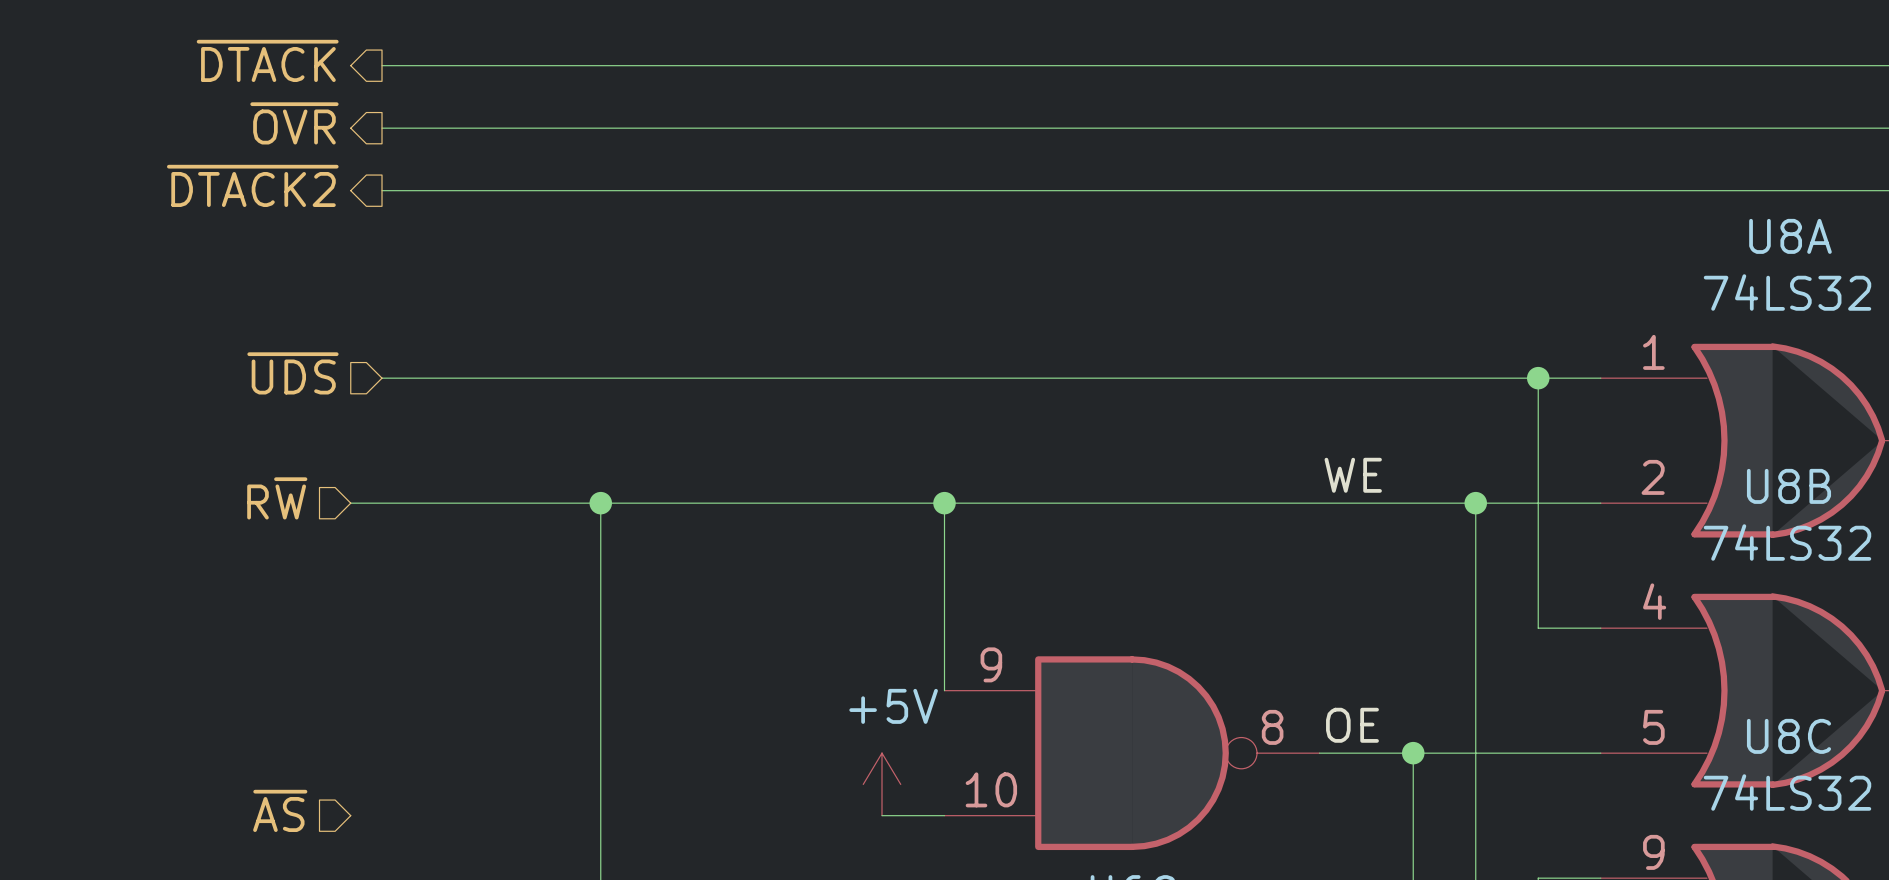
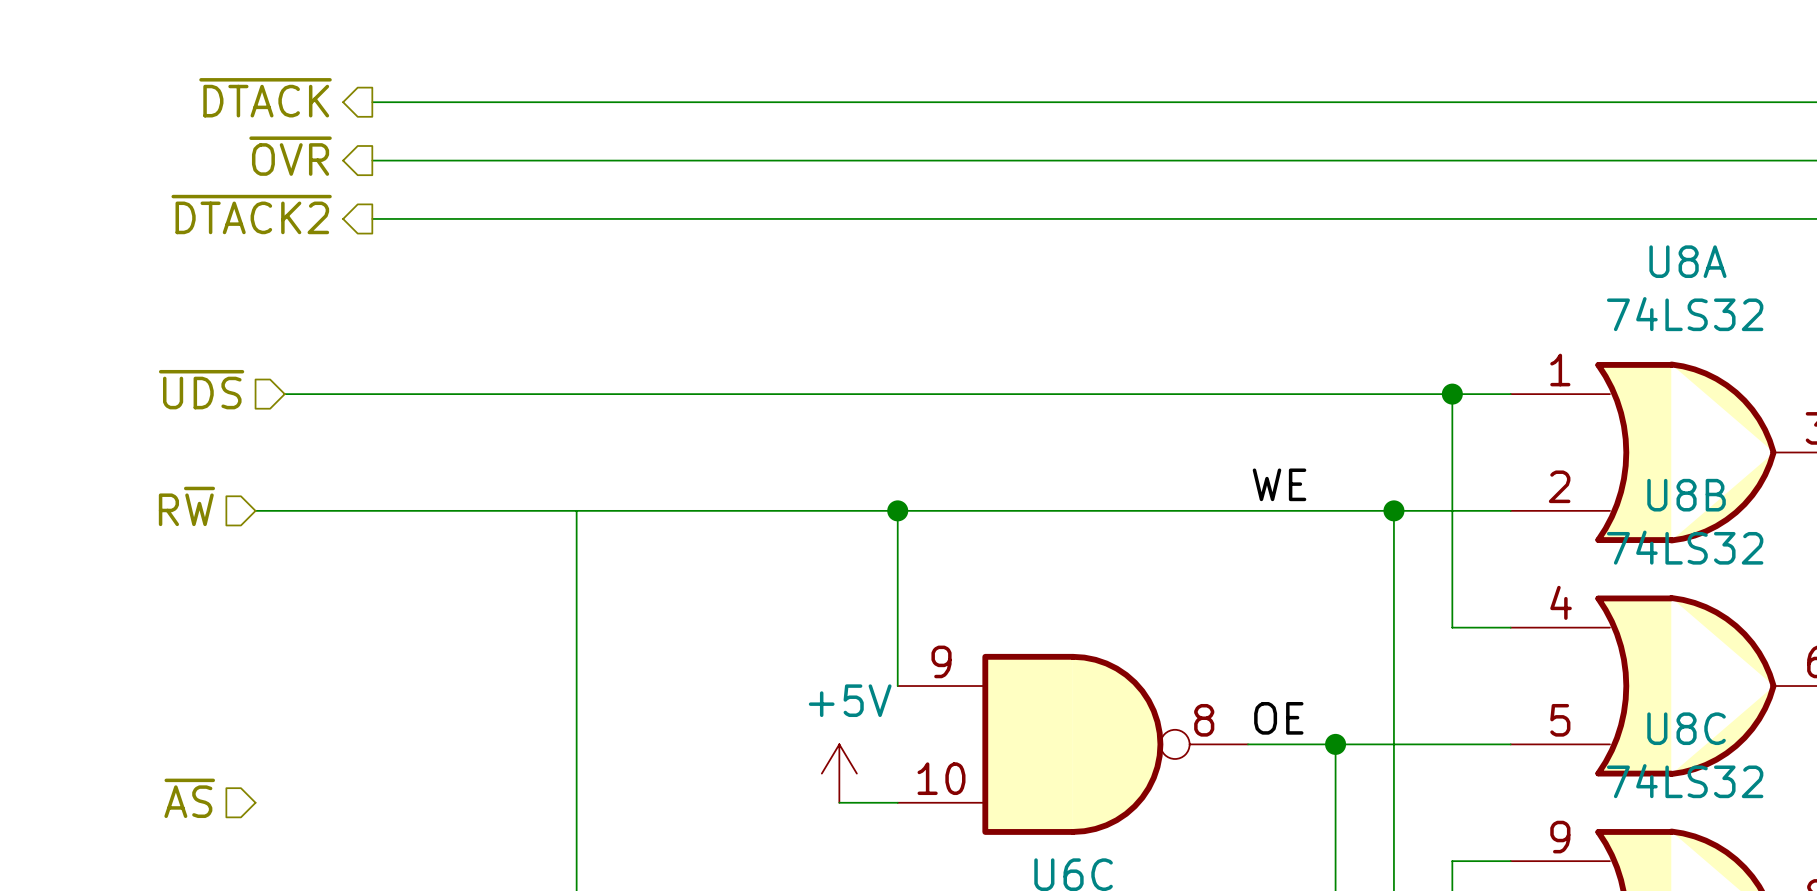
hierarchical label position: ~{UDS} (292, 373) -> ~{UDS} (201, 389)
wire: none -> (284, 394) (372, 394)
hierarchical label position: R~{W} (277, 498) -> R~{W} (186, 506)
wire: none -> (255, 510) (343, 510)
junction: (600, 503) -> none
hierarchical label position: ~{AS} (280, 810) -> ~{AS} (189, 798)

